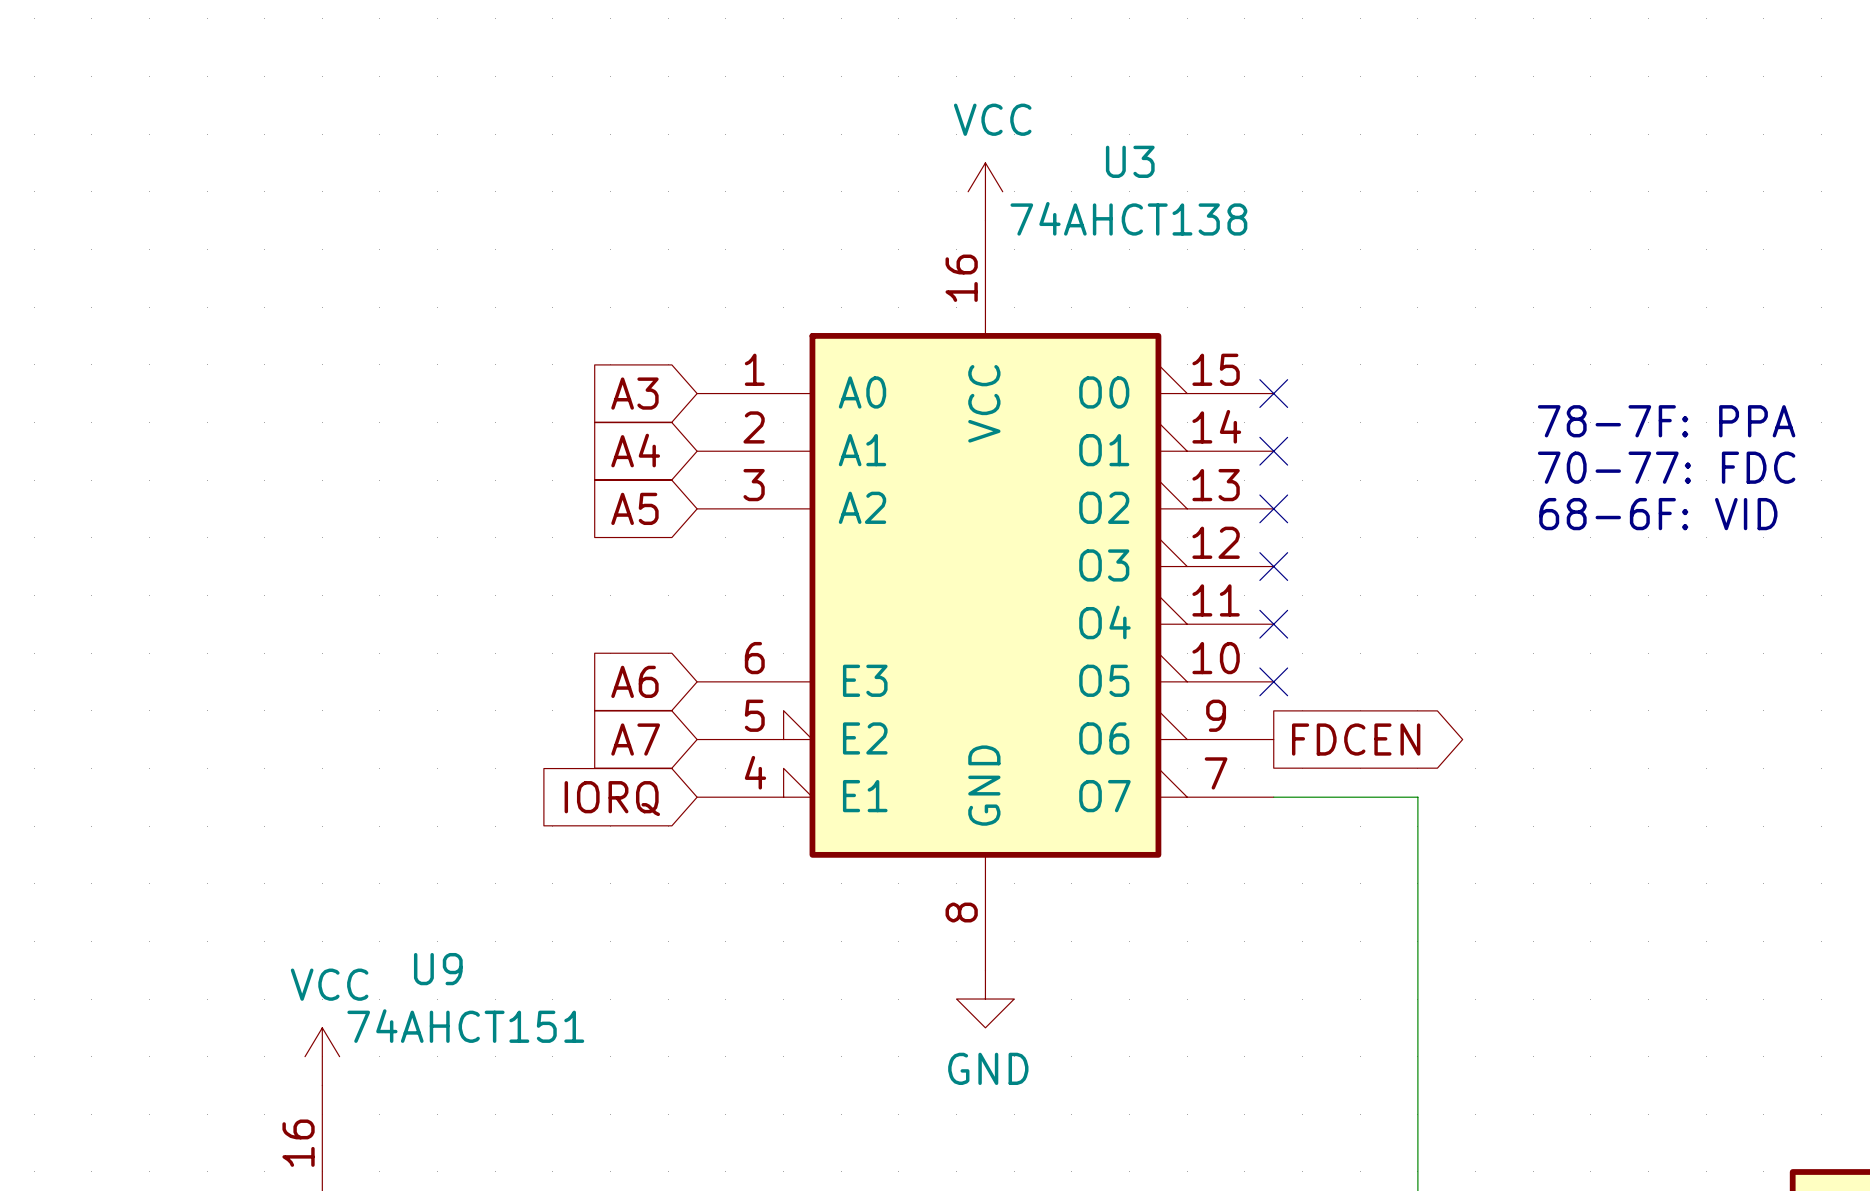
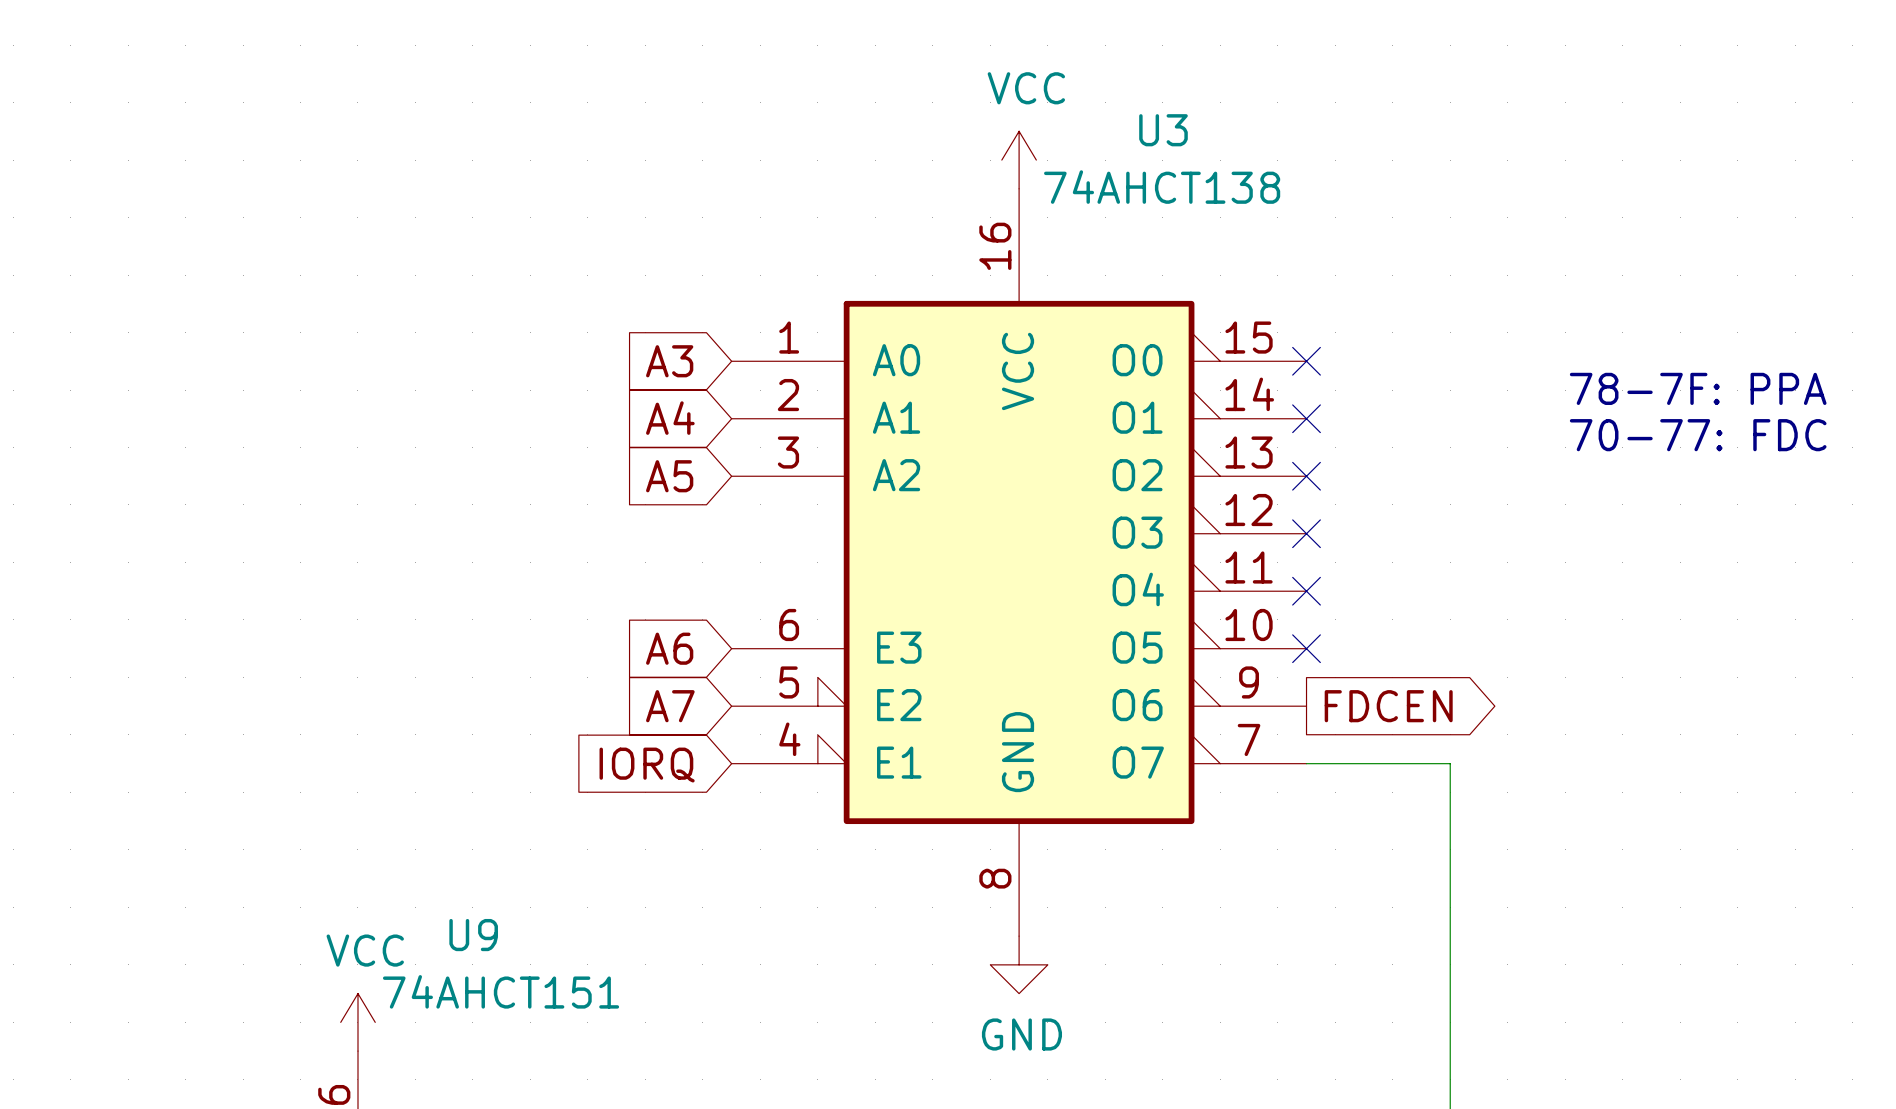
text: 68-6F: VID (1658, 514) -> none

